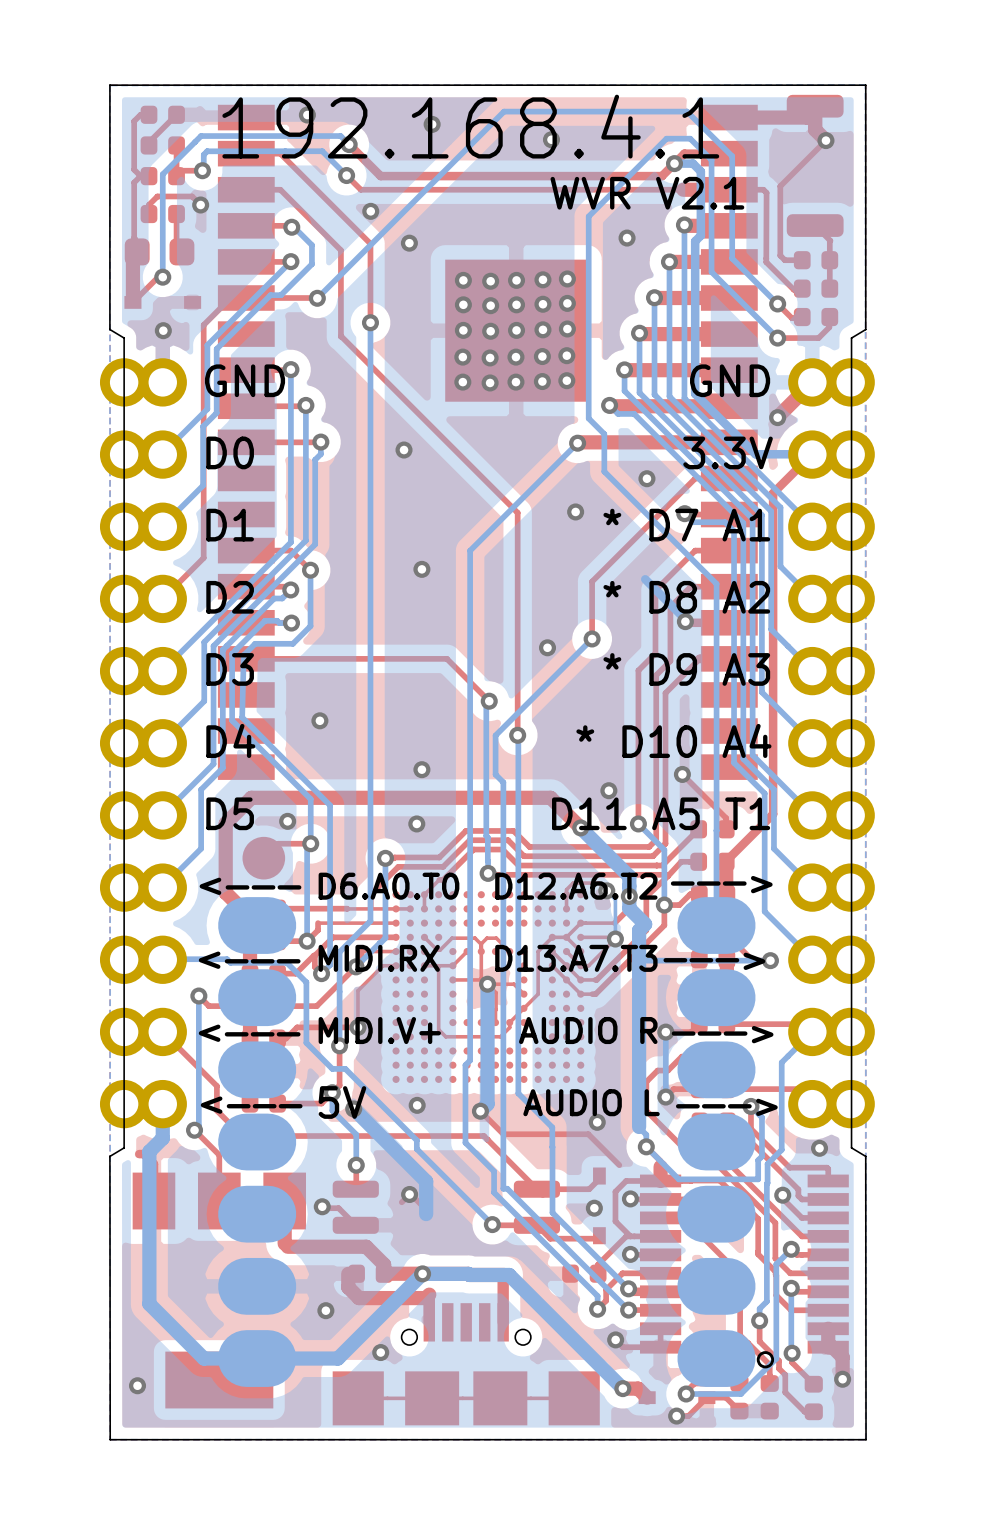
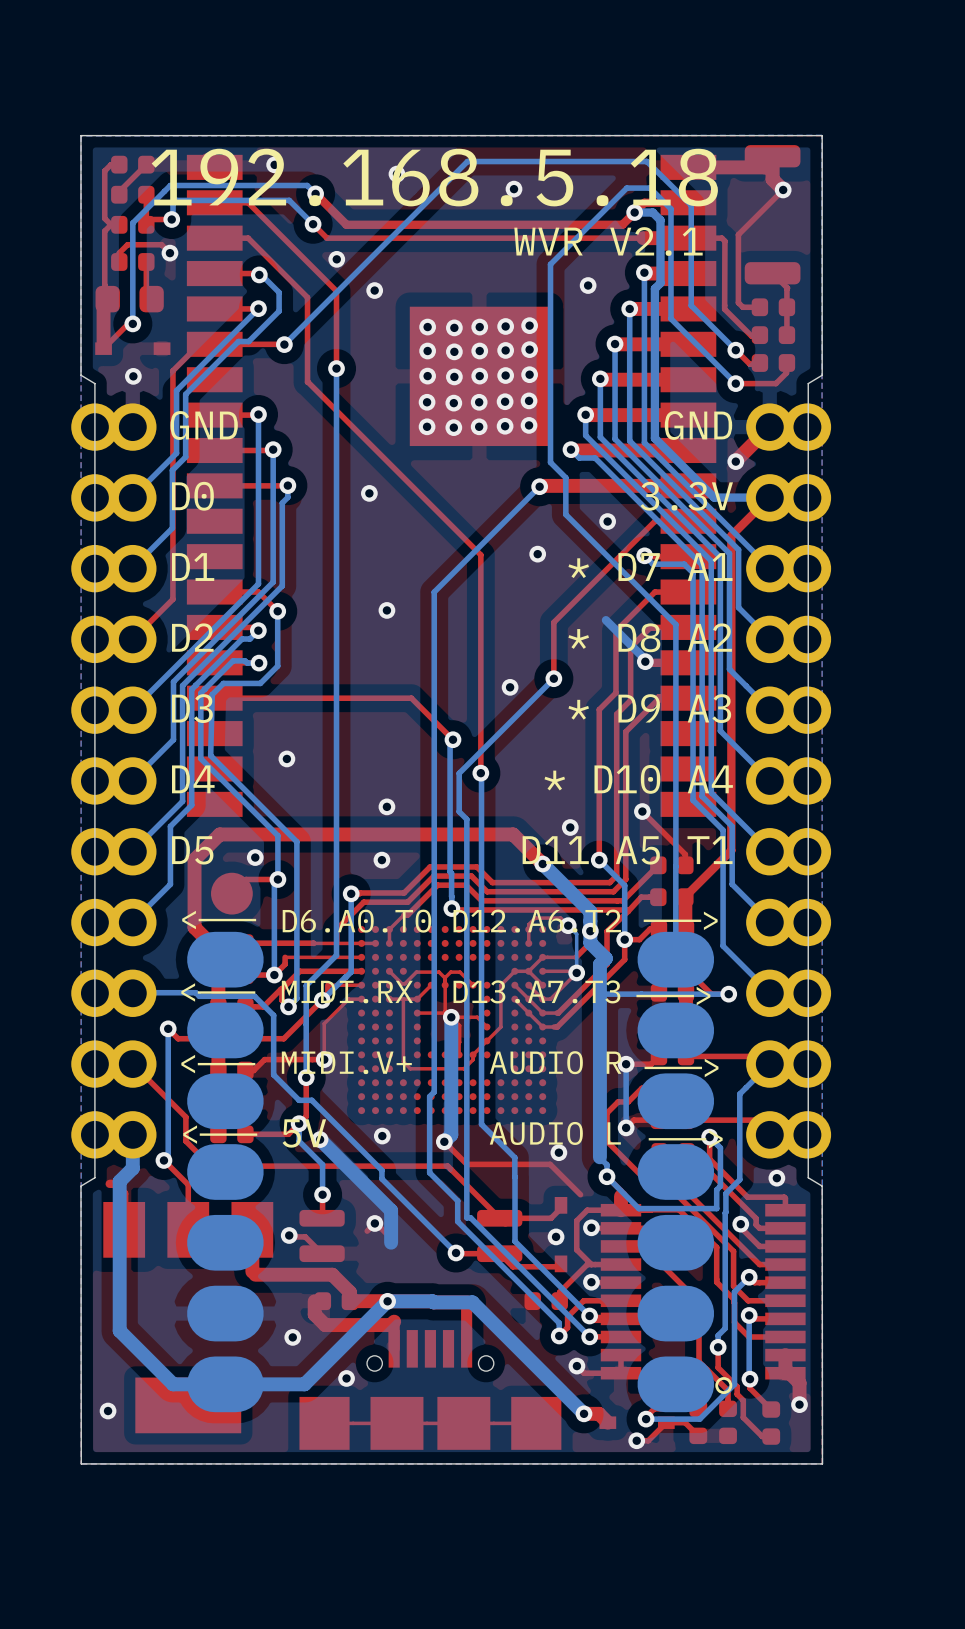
text: 192.168.4.1 (470, 126) -> 192.168.5.18 (434, 177)

